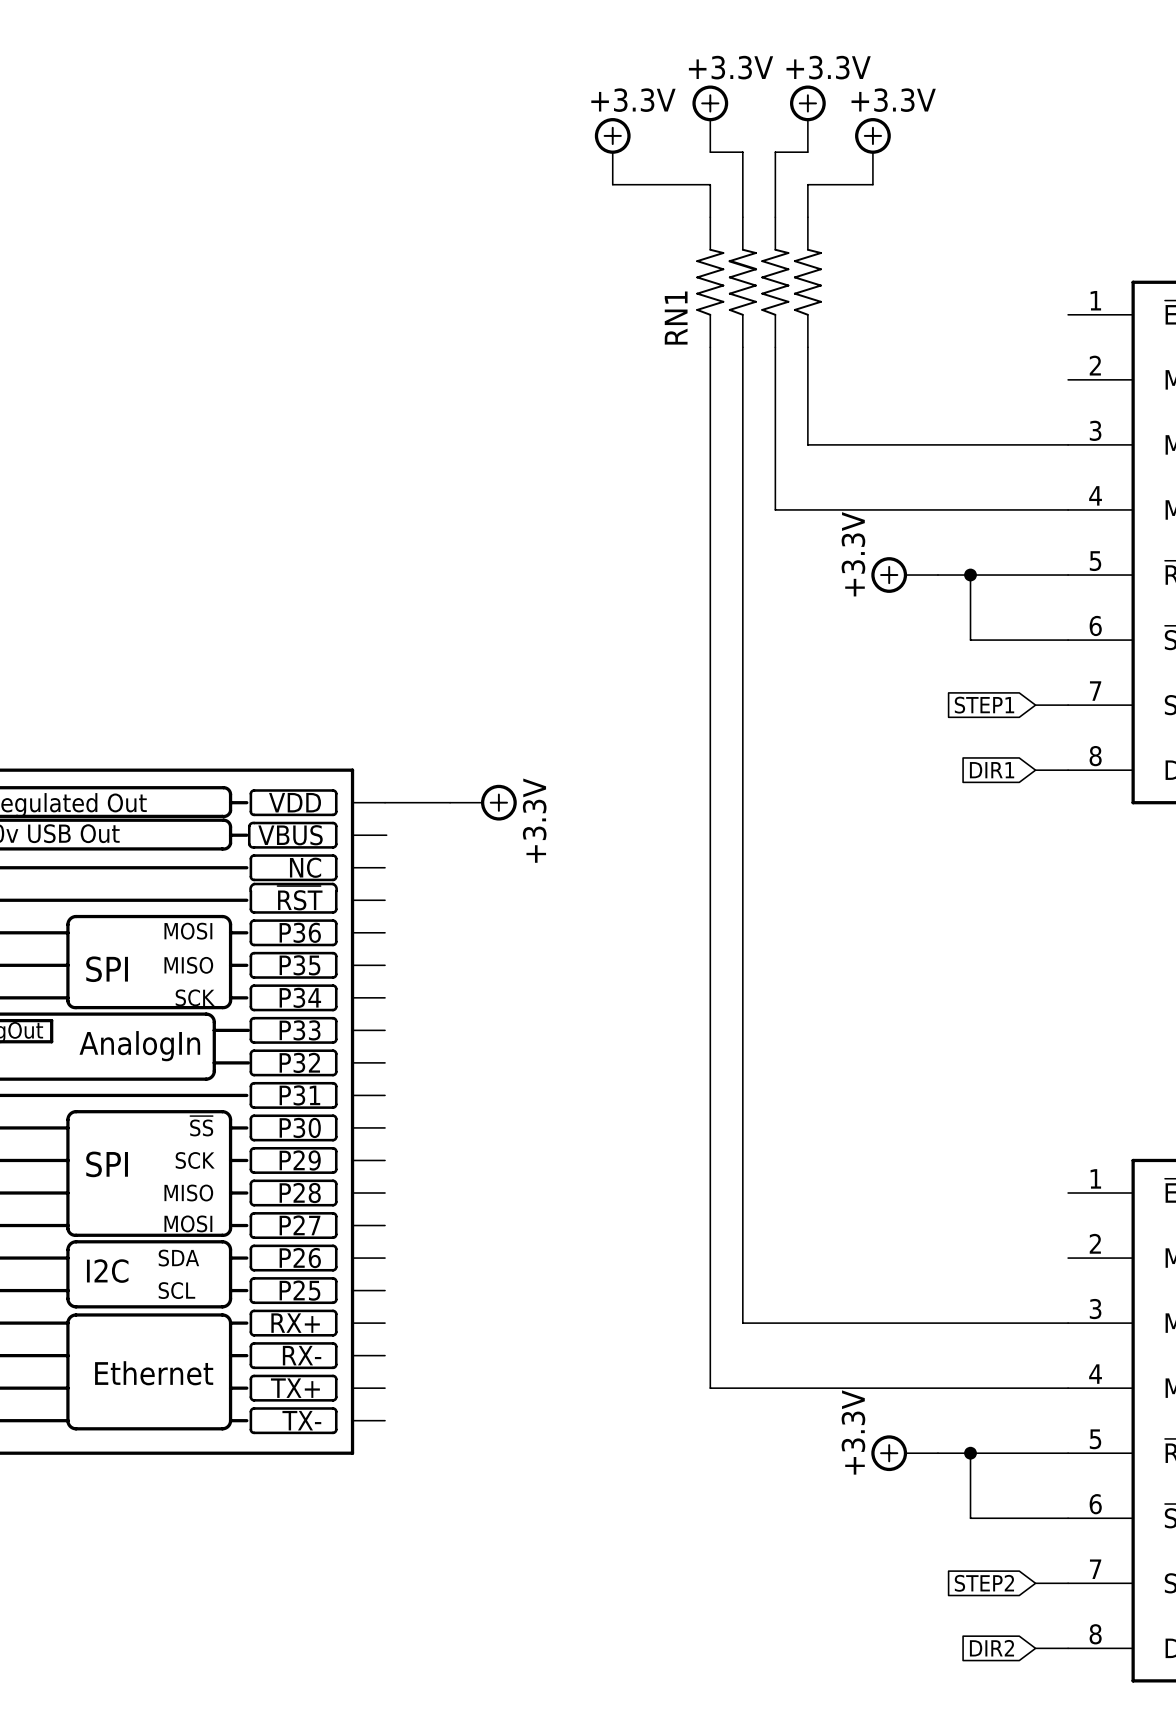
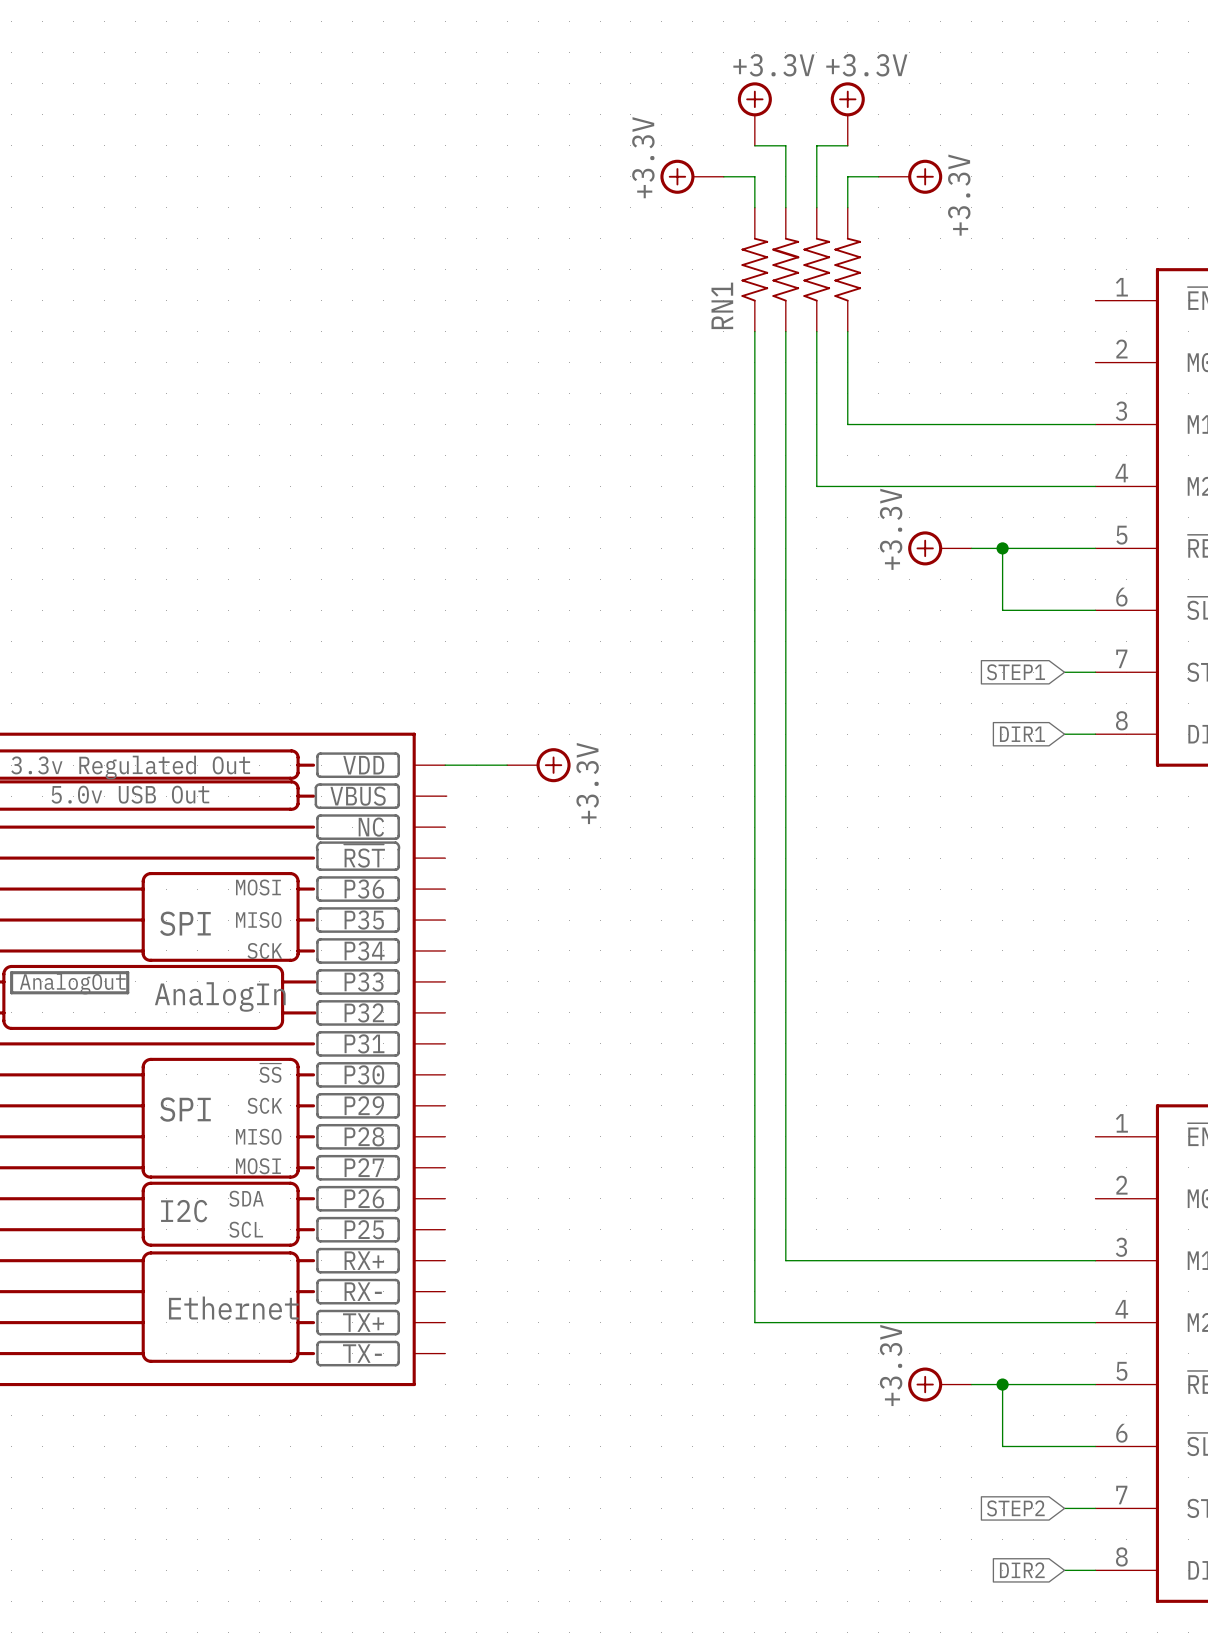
power symbol rotation: 0° (612, 135) -> 90° counterclockwise (677, 176)
power symbol rotation: 0° (872, 135) -> 90° clockwise (925, 176)
power symbol position: +3.3V (612, 151) -> +3.3V (692, 176)

